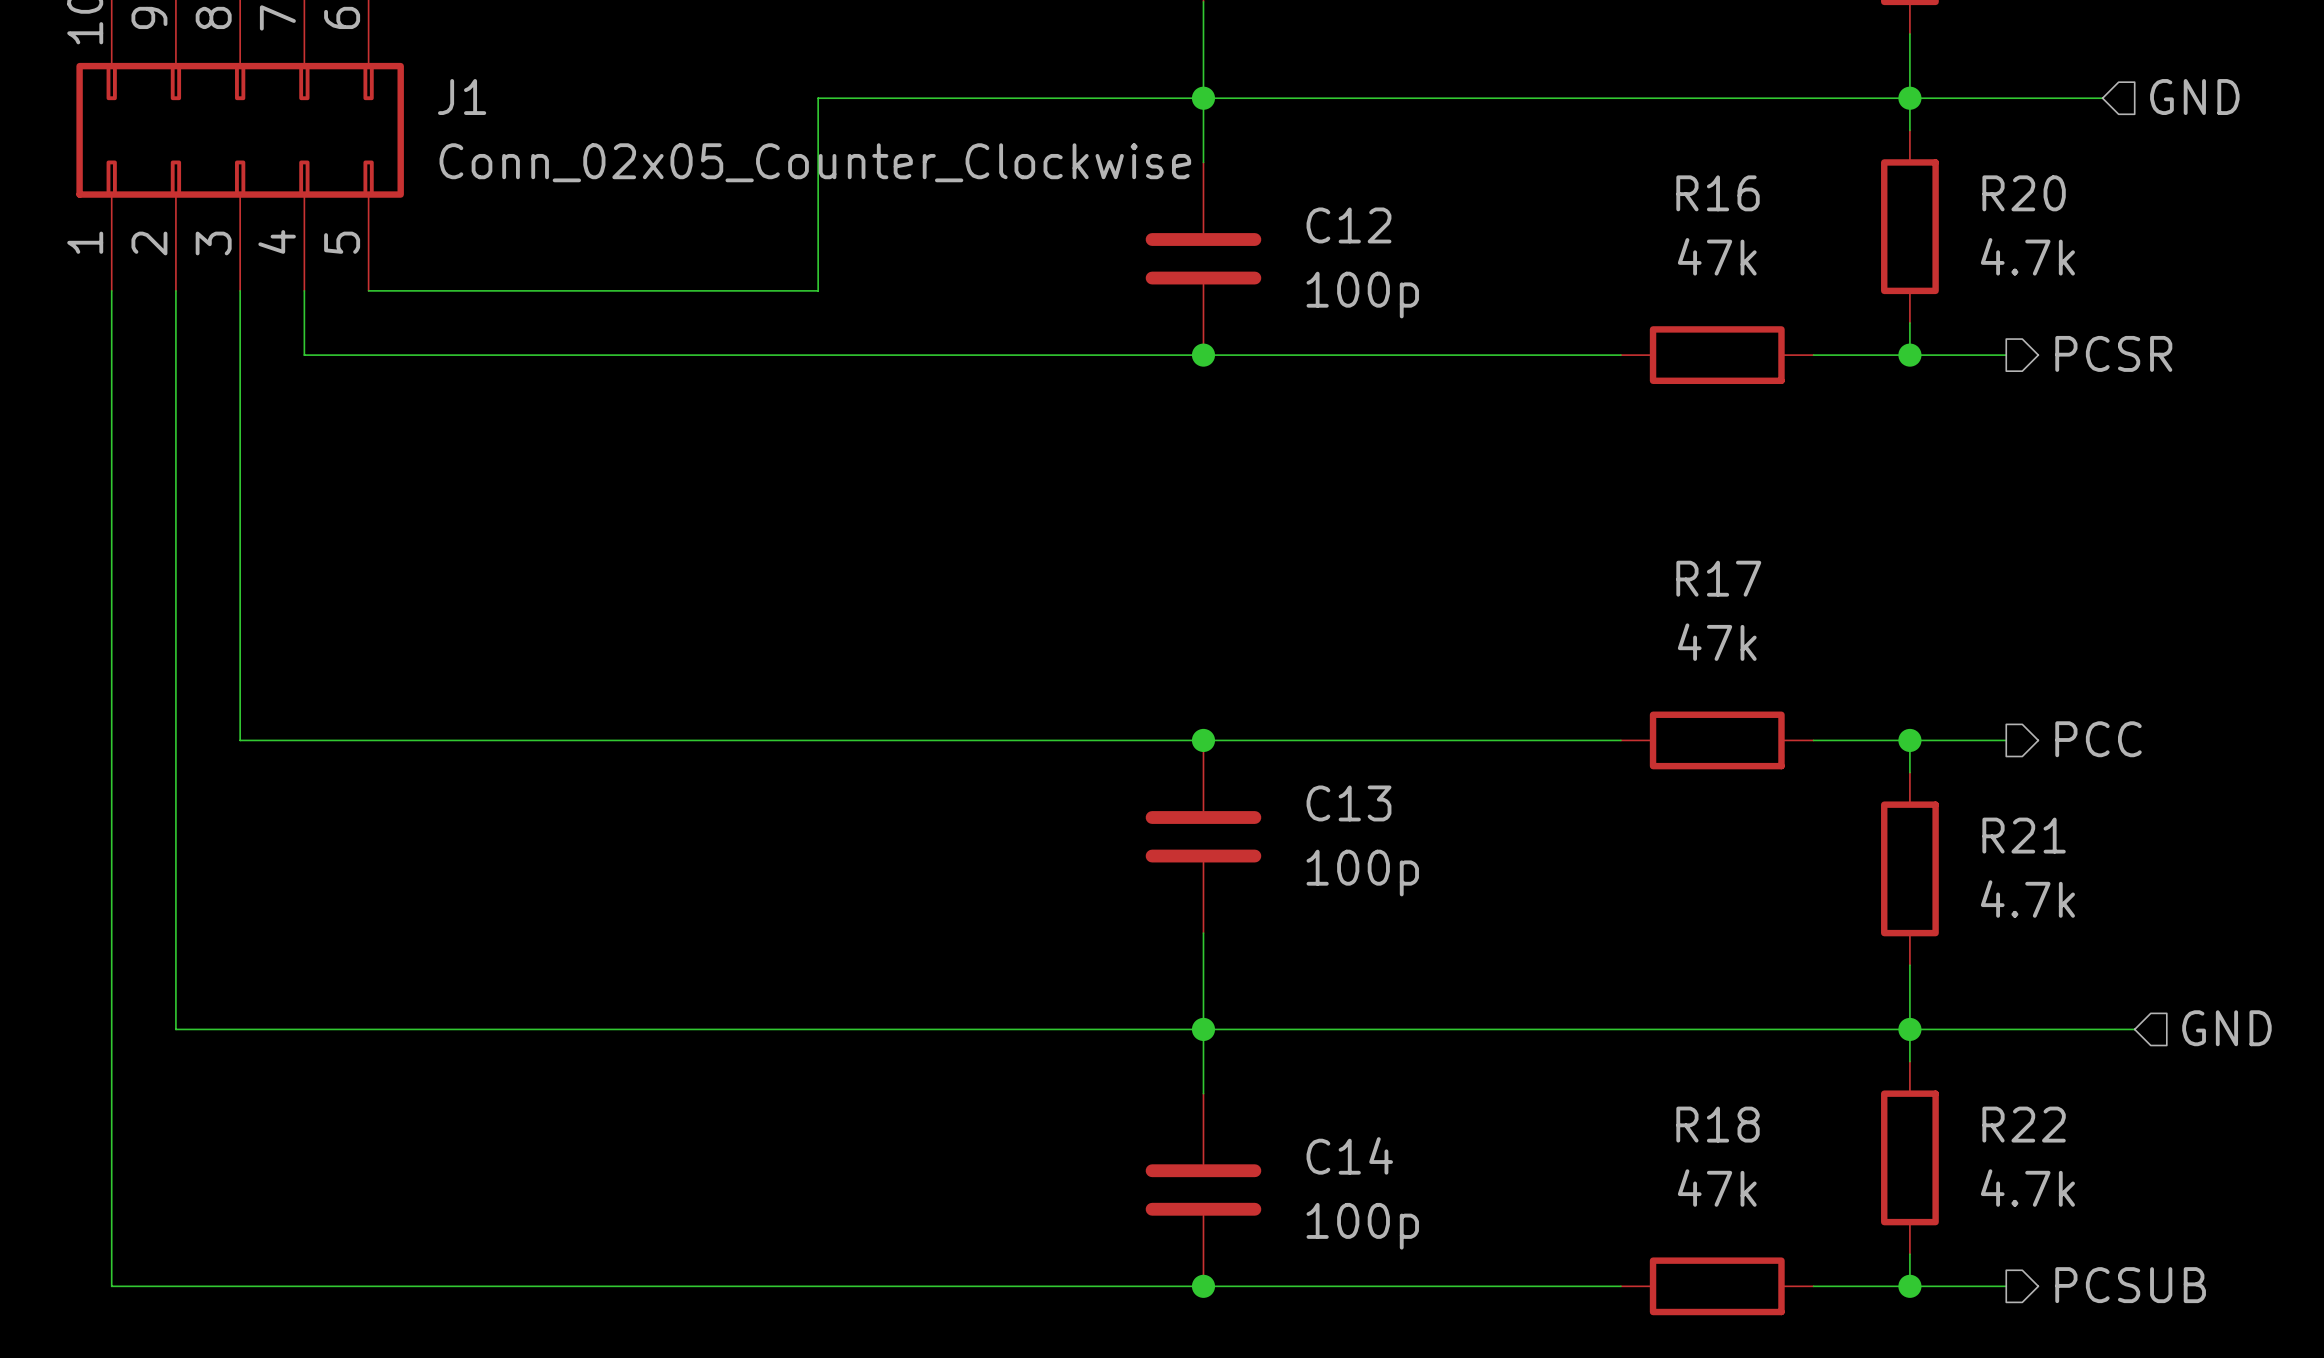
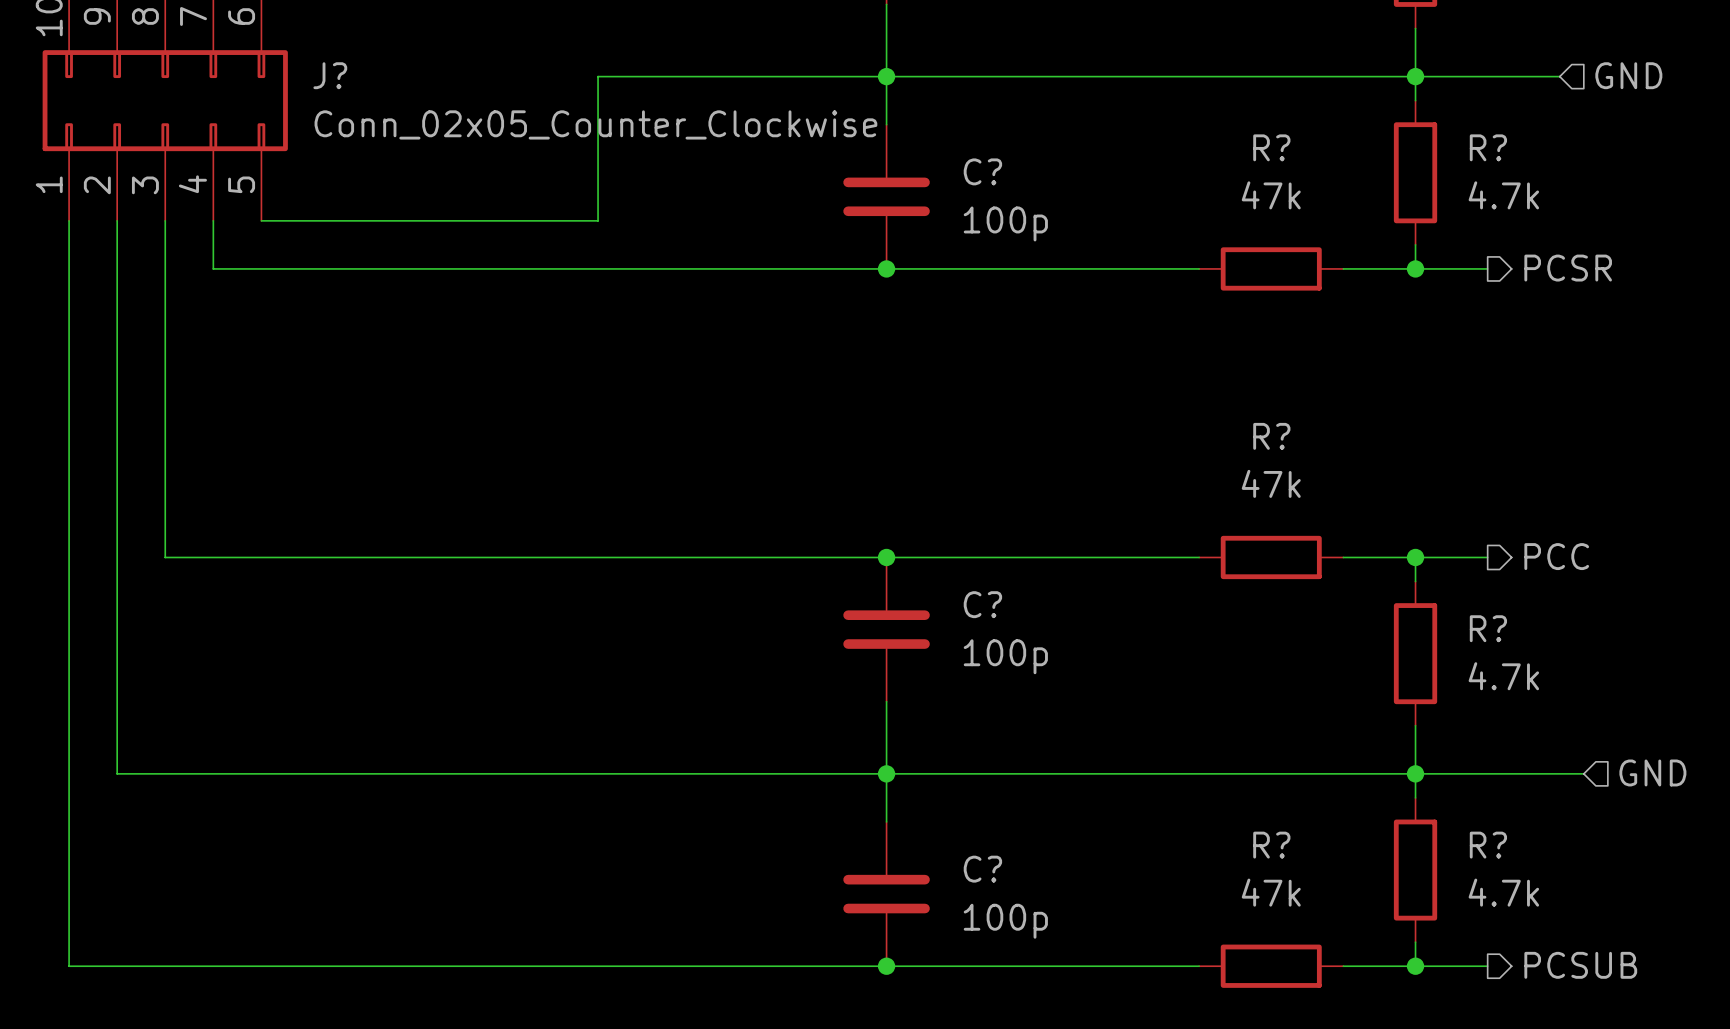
J1 name: J1 (462, 97) -> J? (330, 75)
R16 name: R16 (1718, 193) -> R? (1271, 147)
R20 name: R20 (2024, 193) -> R? (1488, 147)
C12 name: C12 (1348, 225) -> C? (982, 171)
R17 name: R17 (1718, 578) -> R? (1271, 436)
C13 name: C13 (1348, 803) -> C? (982, 604)
R21 name: R21 (2024, 835) -> R? (1488, 628)
R18 name: R18 (1718, 1124) -> R? (1271, 845)
R22 name: R22 (2024, 1124) -> R? (1488, 845)
C14 name: C14 (1349, 1155) -> C? (982, 869)

